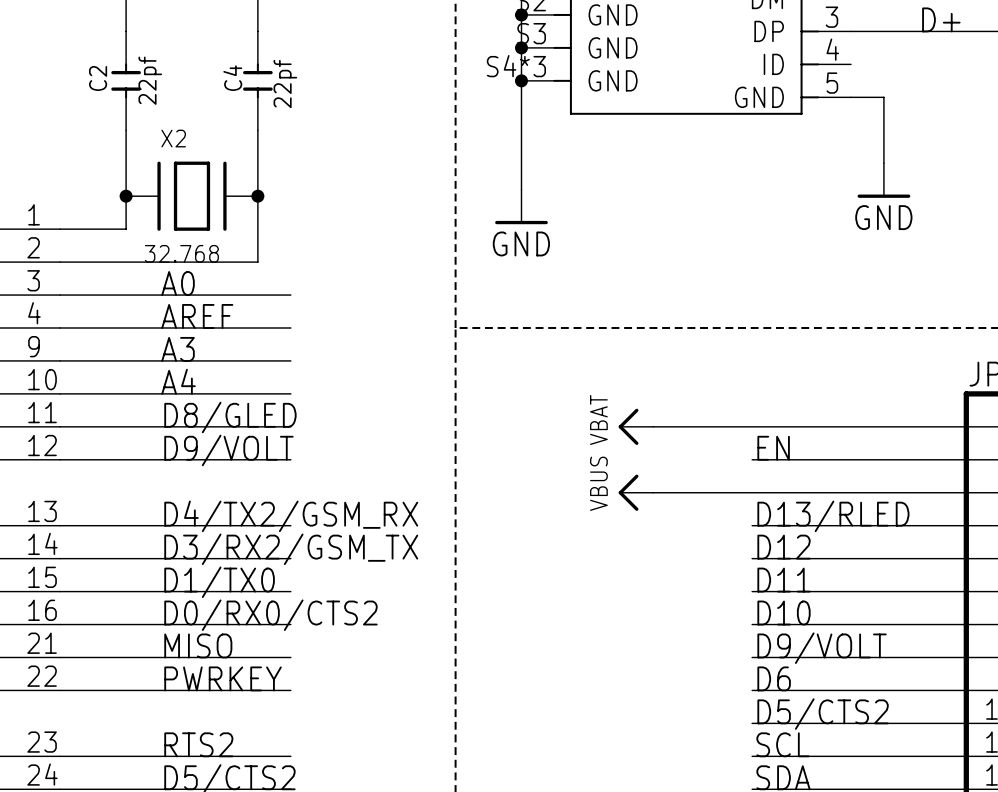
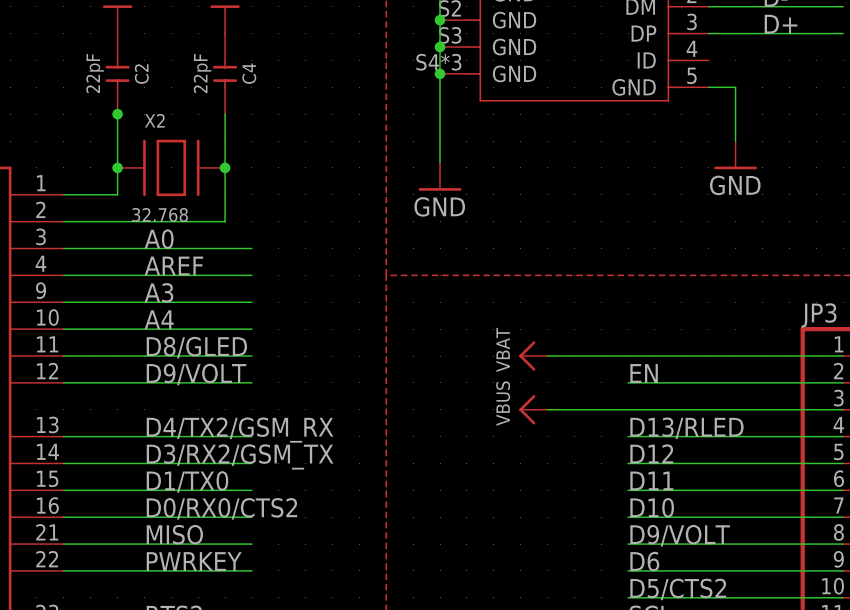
C2 name position: C2 (98, 78) -> C2 (141, 74)
C4 name position: C4 (232, 78) -> C4 (249, 73)
C2 value: 22pf (150, 80) -> 22pF (95, 73)
C4 value: 22pf (285, 84) -> 22pF (202, 73)
junction: none -> (117, 114)

